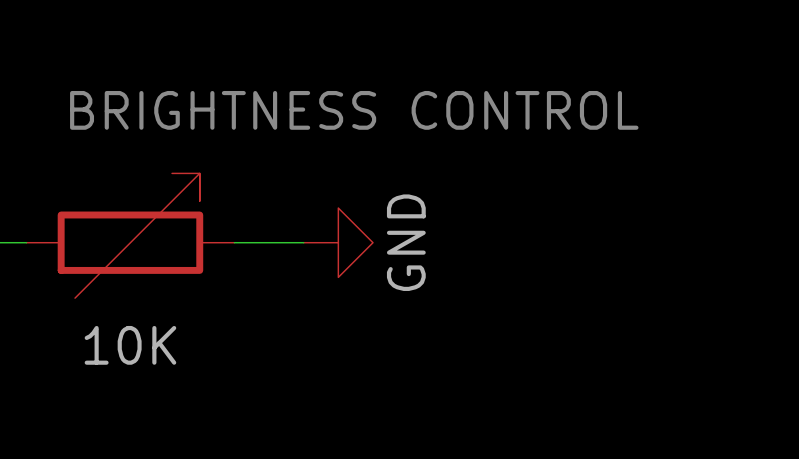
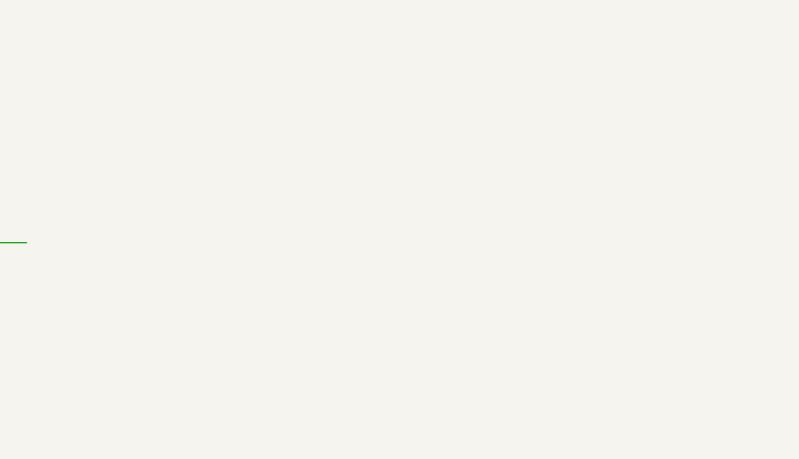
text: BRIGHTNESS CONTROL (354, 110) -> none
part: 10K (130, 235) -> none
wire: (234, 242) (303, 242) -> none
power symbol: GND (338, 242) -> none

